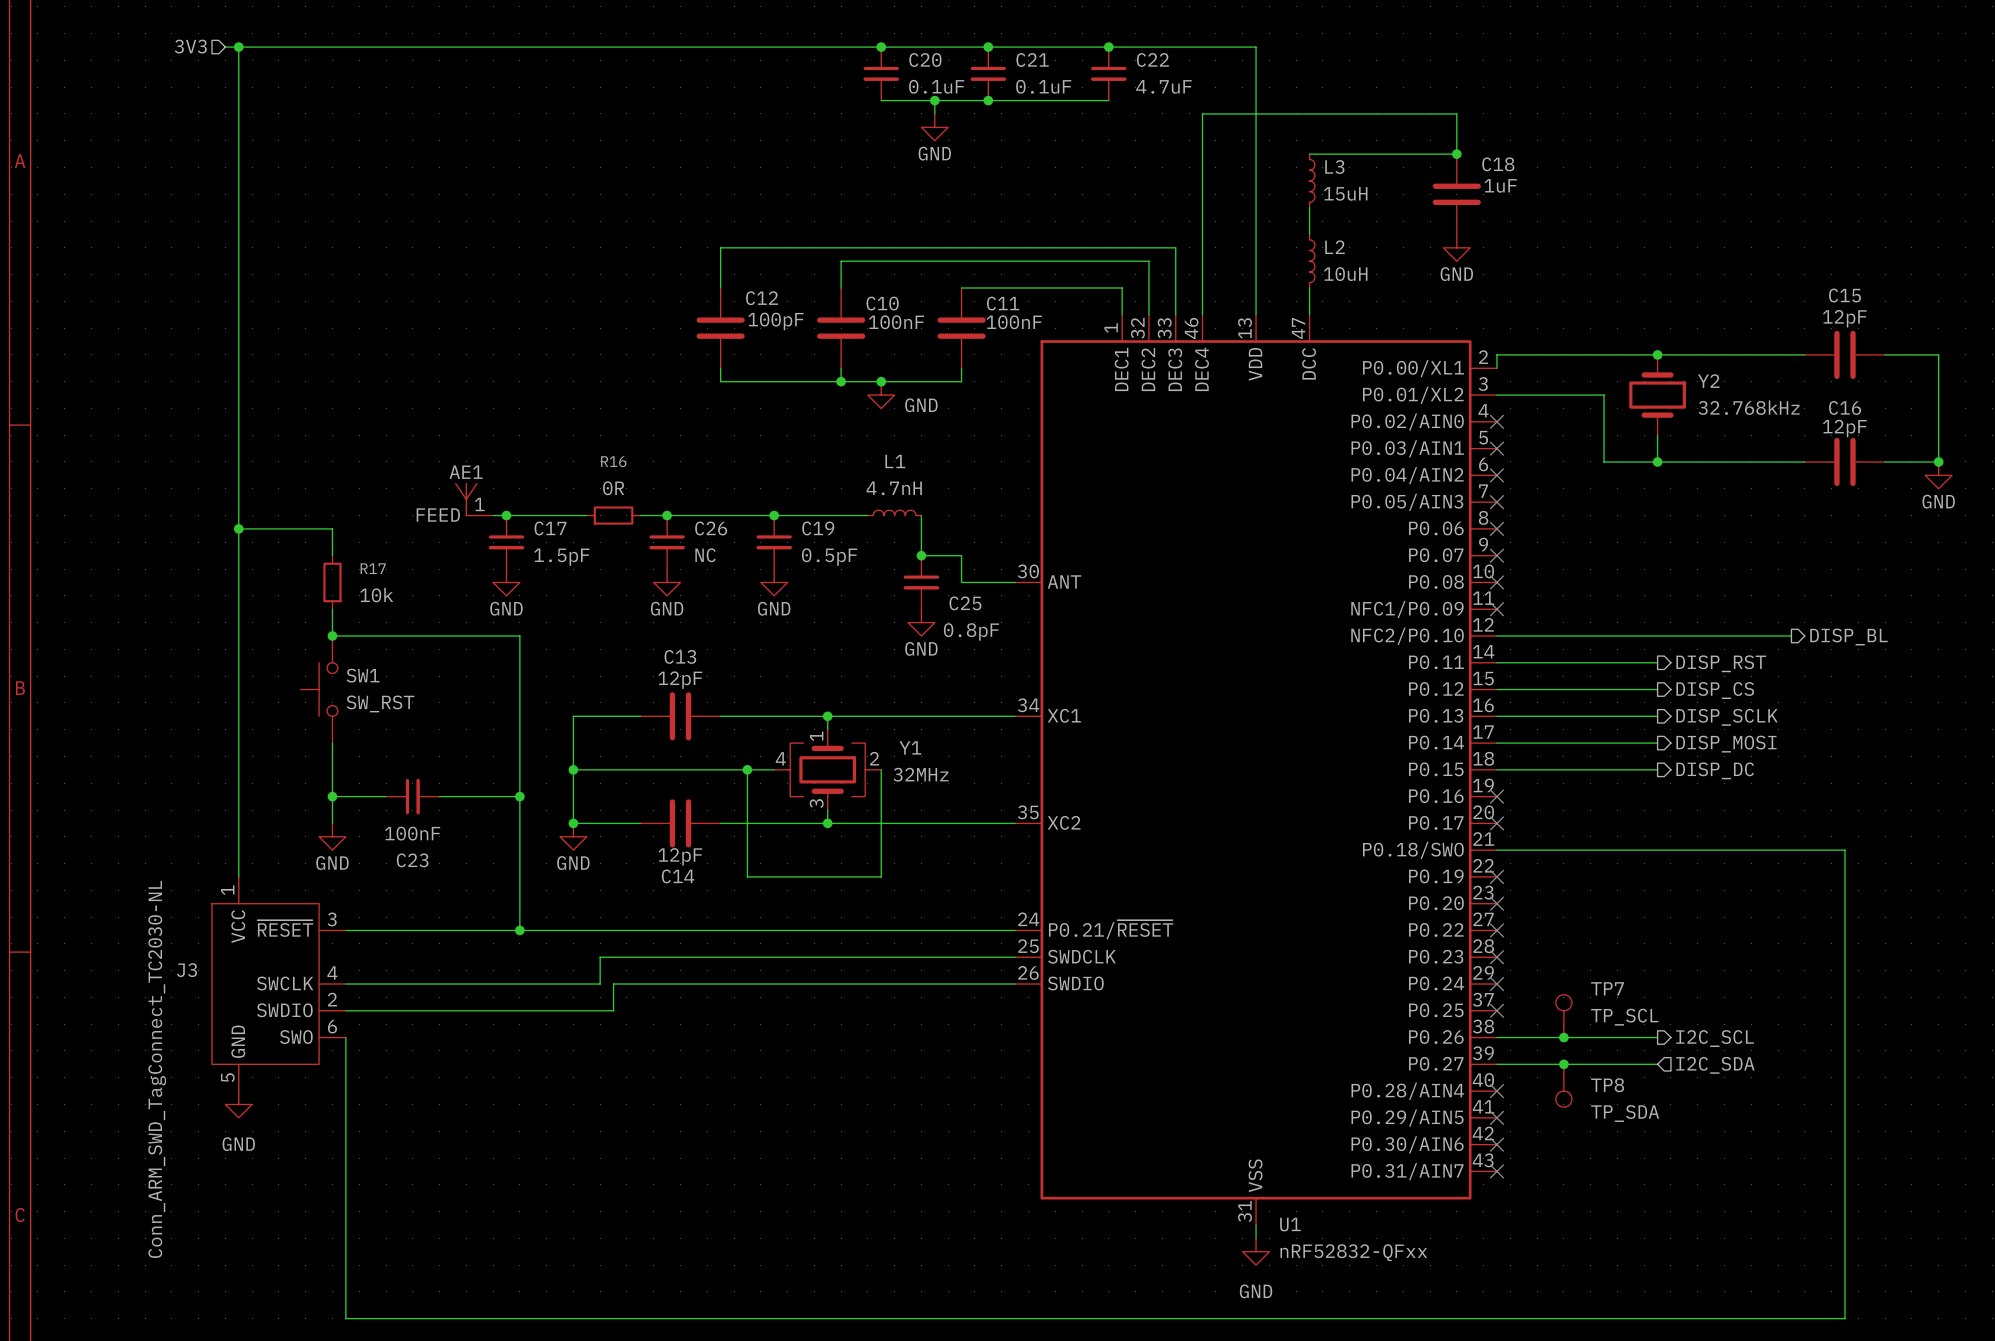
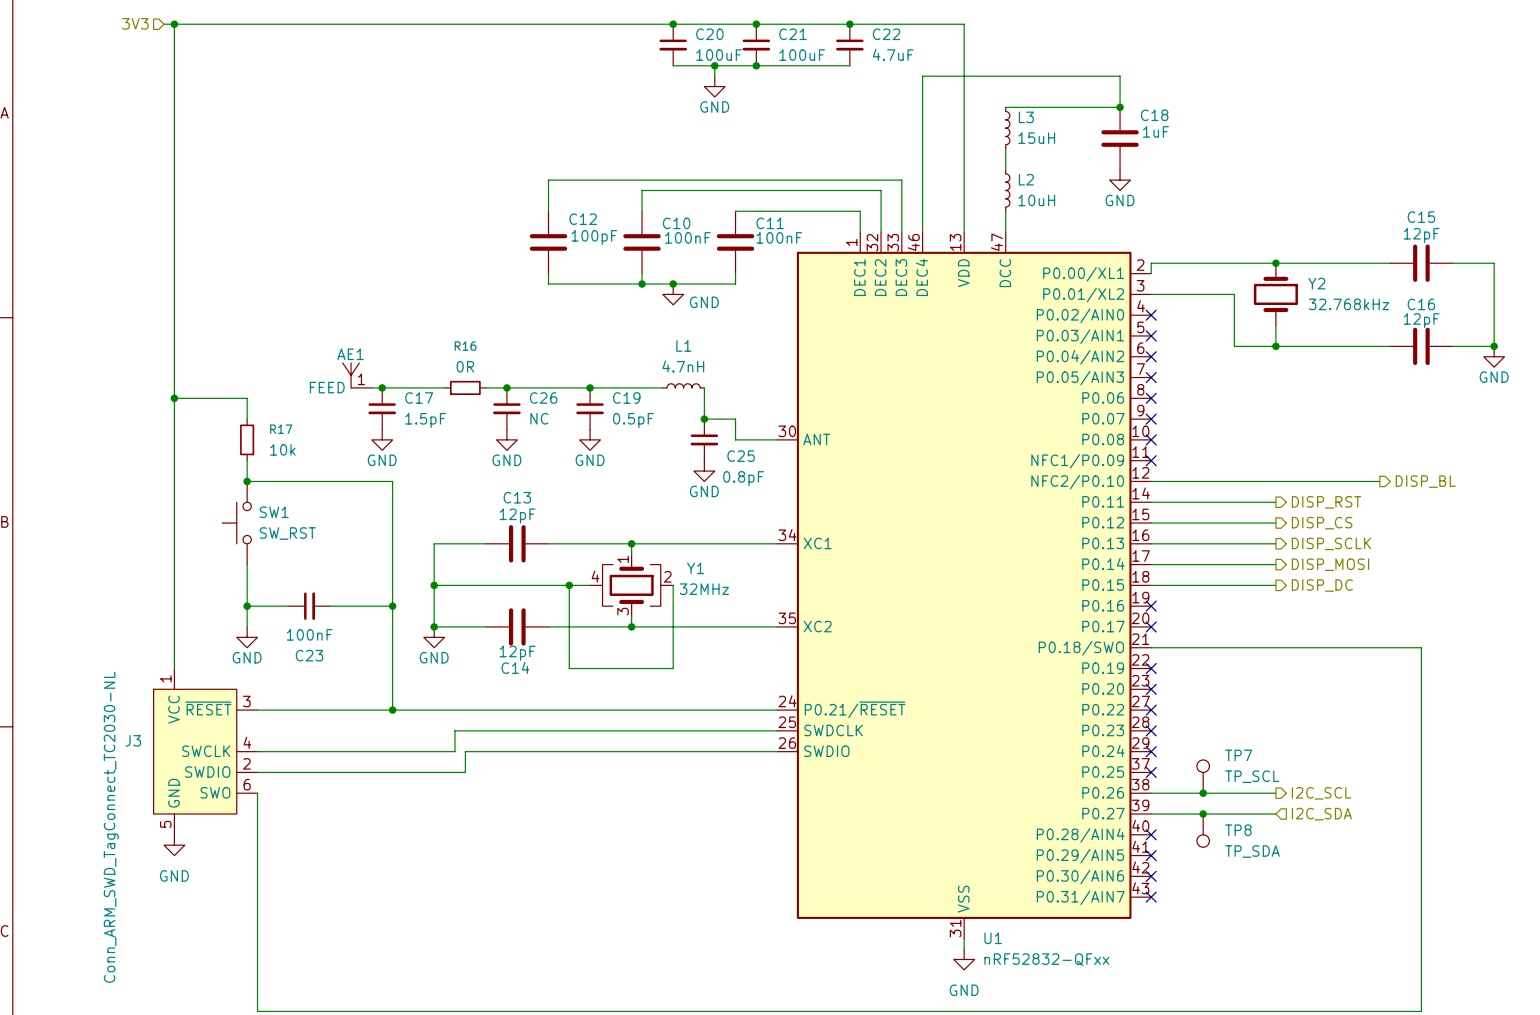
C20 value: 0.1uF (936, 86) -> 100uF (719, 55)
C21 value: 0.1uF (1043, 86) -> 100uF (802, 55)

